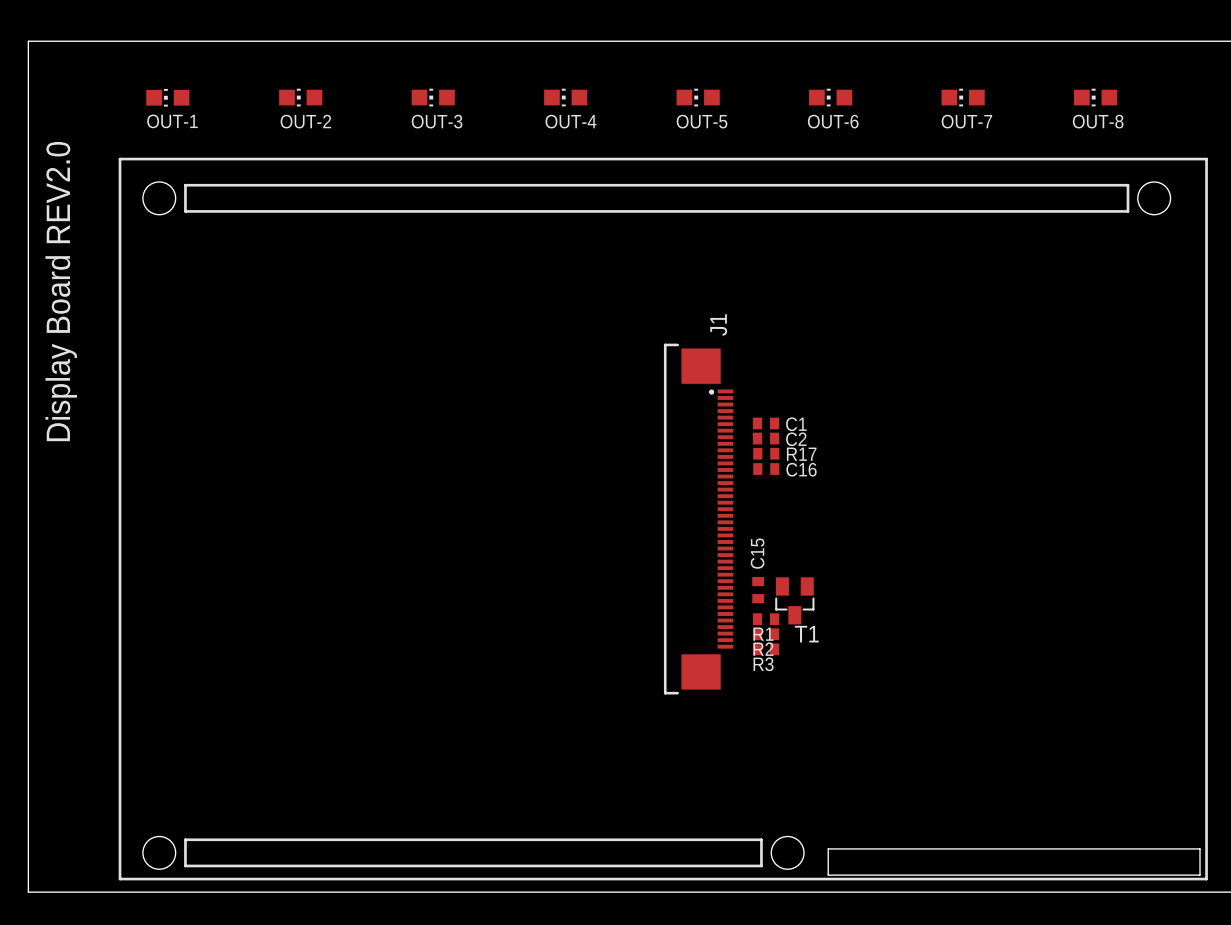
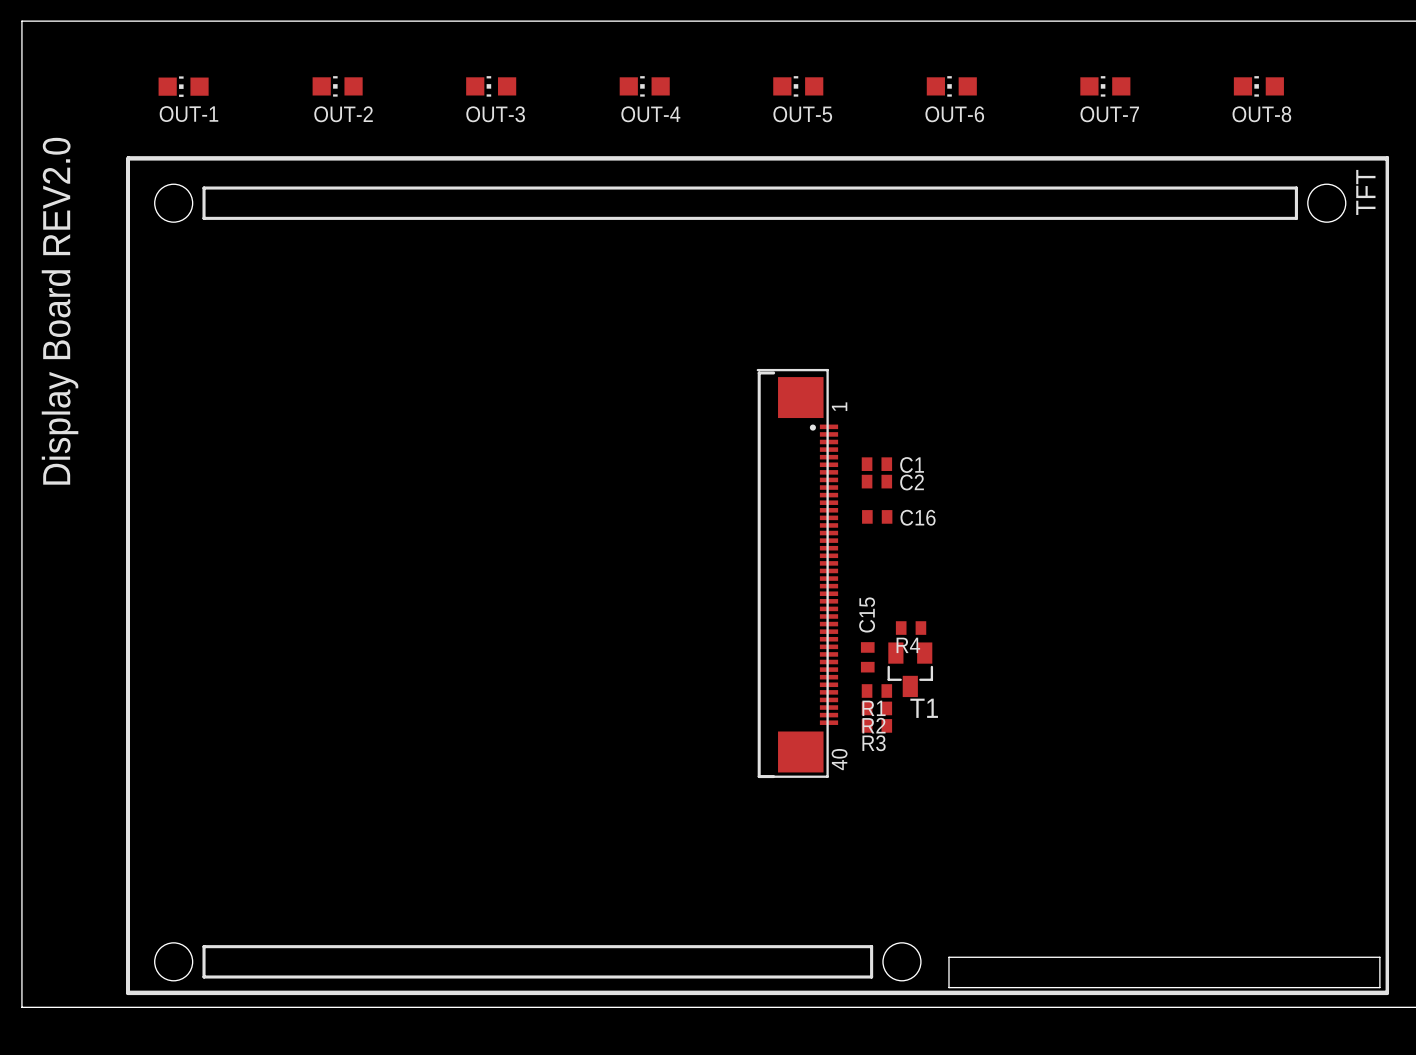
line: none -> (757, 370) (827, 370) (827, 776) (759, 776)
R17: (766, 453) -> none
J1: (698, 519) -> none
TFT: none -> (757, 576)
R4: none -> (911, 628)

